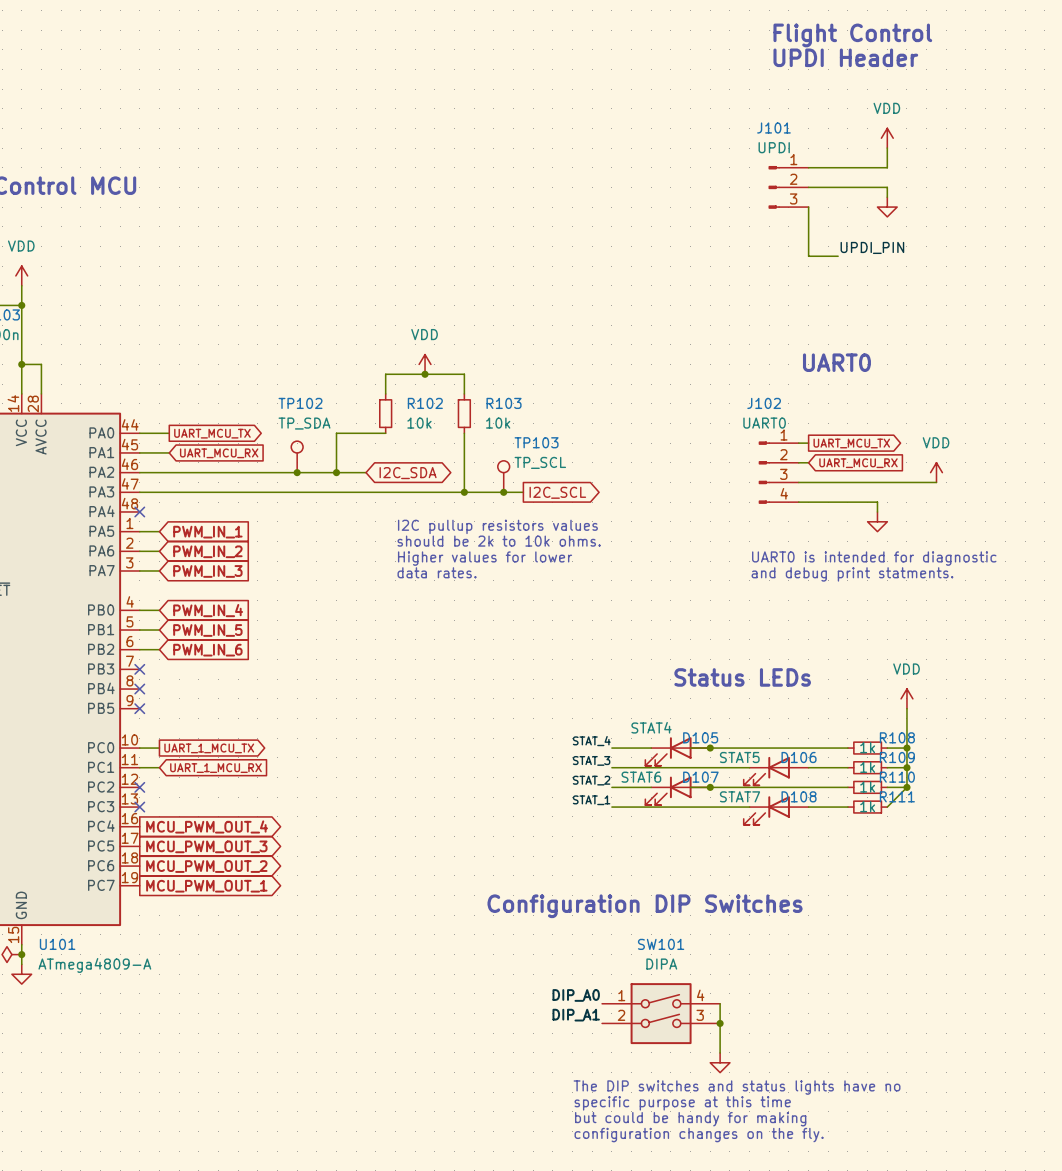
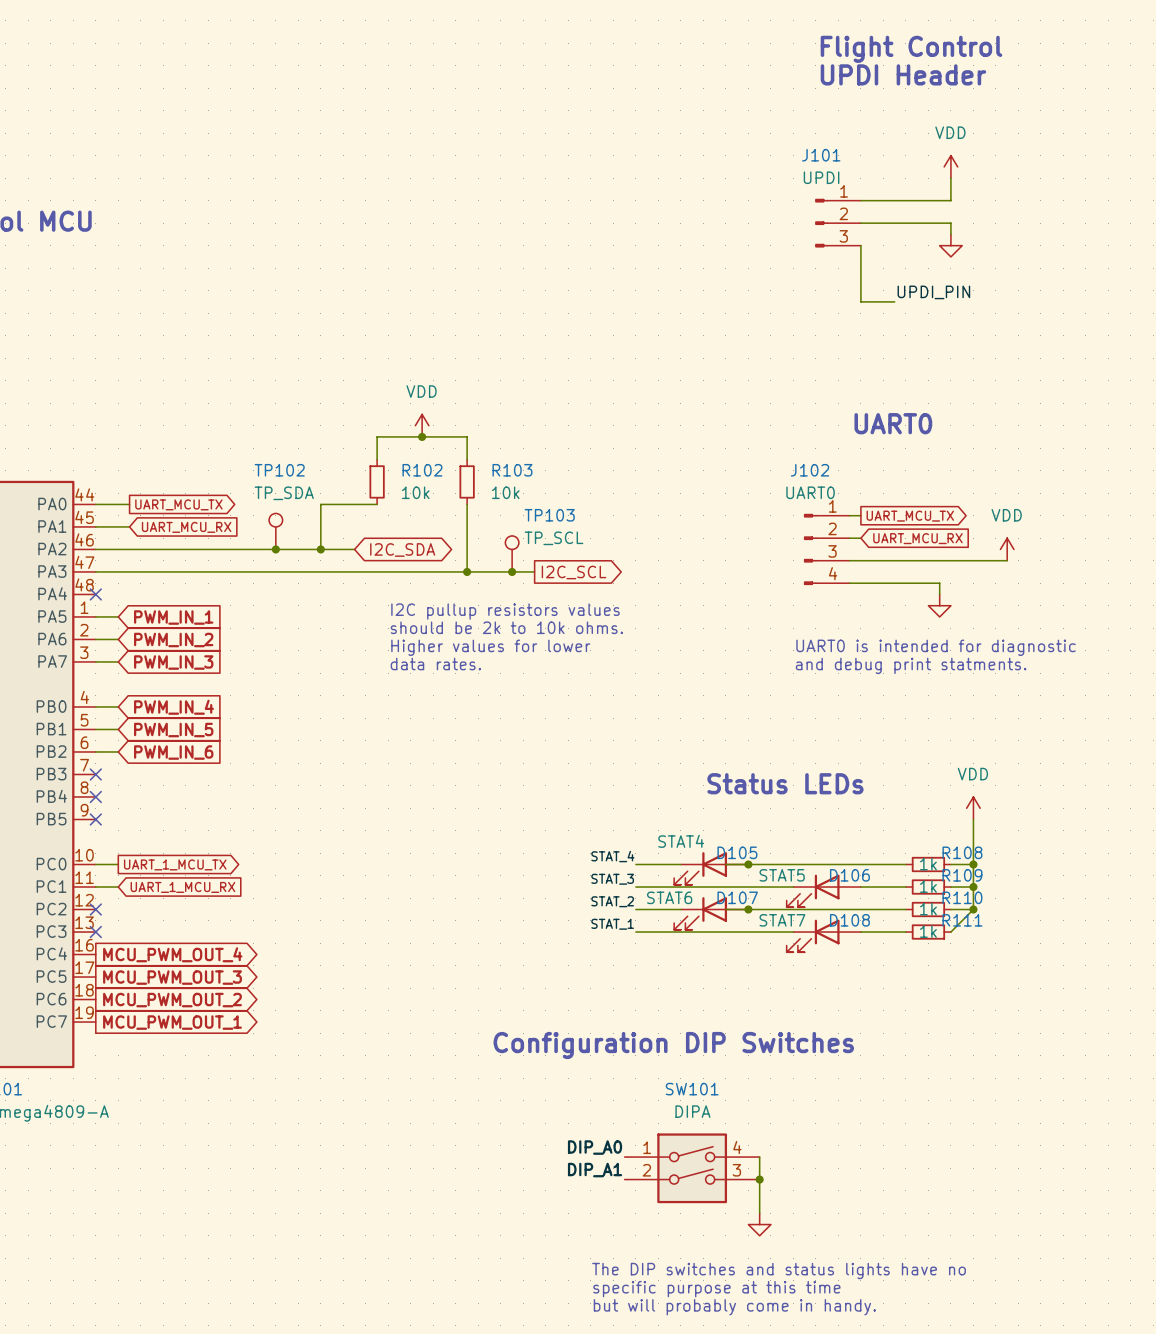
text: The DIP switches and status lights have no (737, 1087) -> none
text: specific purpose at this time (682, 1103) -> The DIP switches and status lights have no (779, 1271)
text: but could be handy for making (690, 1119) -> specific purpose at this time (716, 1289)
text: configuration changes on the fly. (699, 1135) -> but will probably come in handy. (734, 1307)

